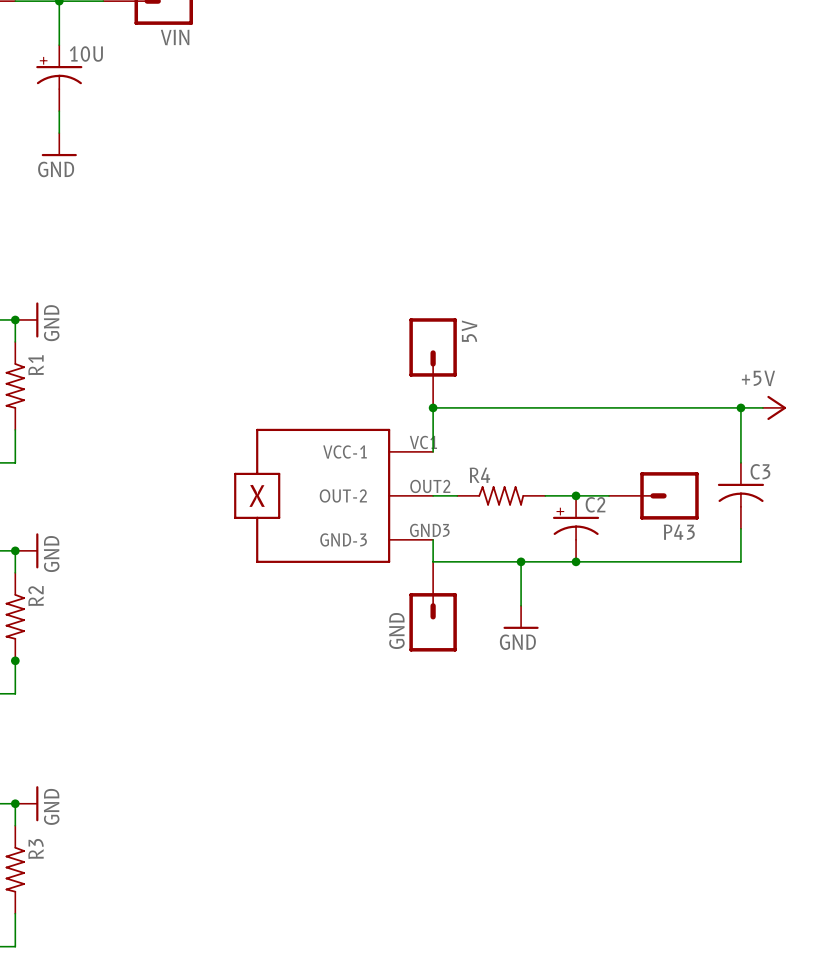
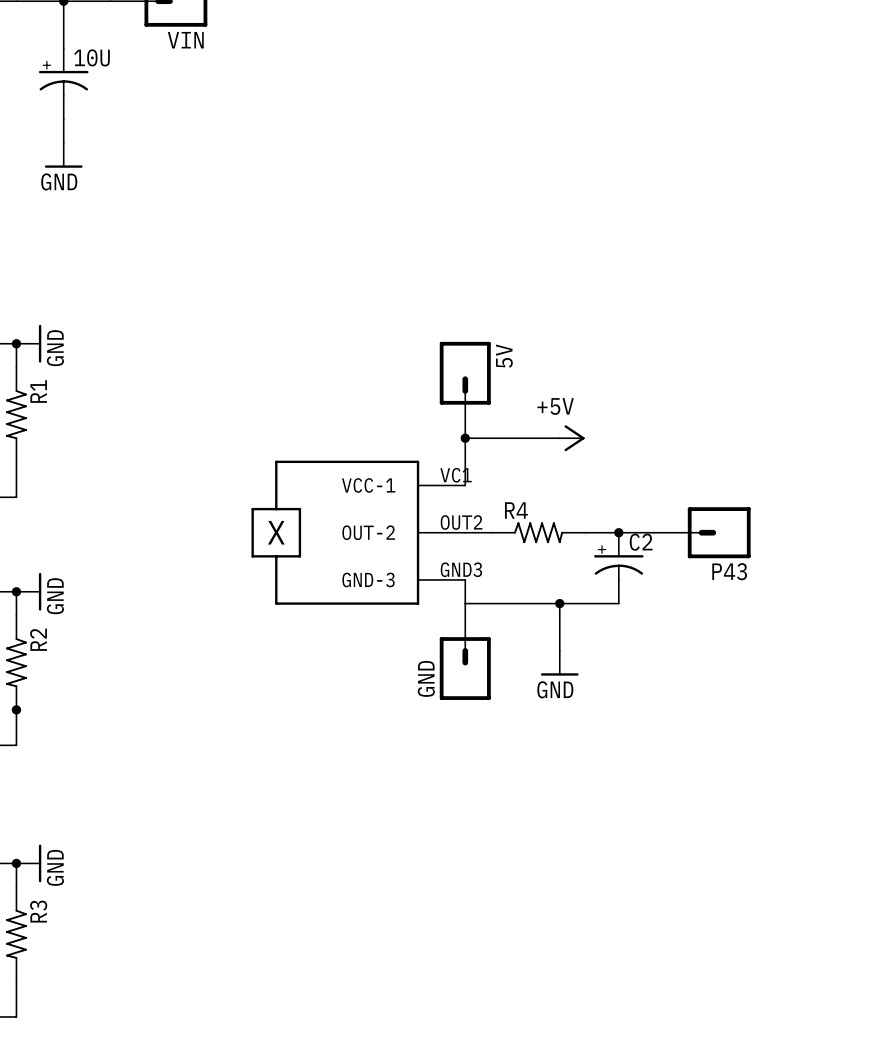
wire: (521, 407) (762, 407) -> none
power symbol: none -> +5V (572, 438)
wire: (740, 407) (740, 462) -> none
junction: (740, 407) -> none
power symbol: +5V (774, 407) -> none
C3: (740, 495) -> none
wire: (740, 528) (740, 561) (576, 561) -> none
junction: (576, 561) -> none

